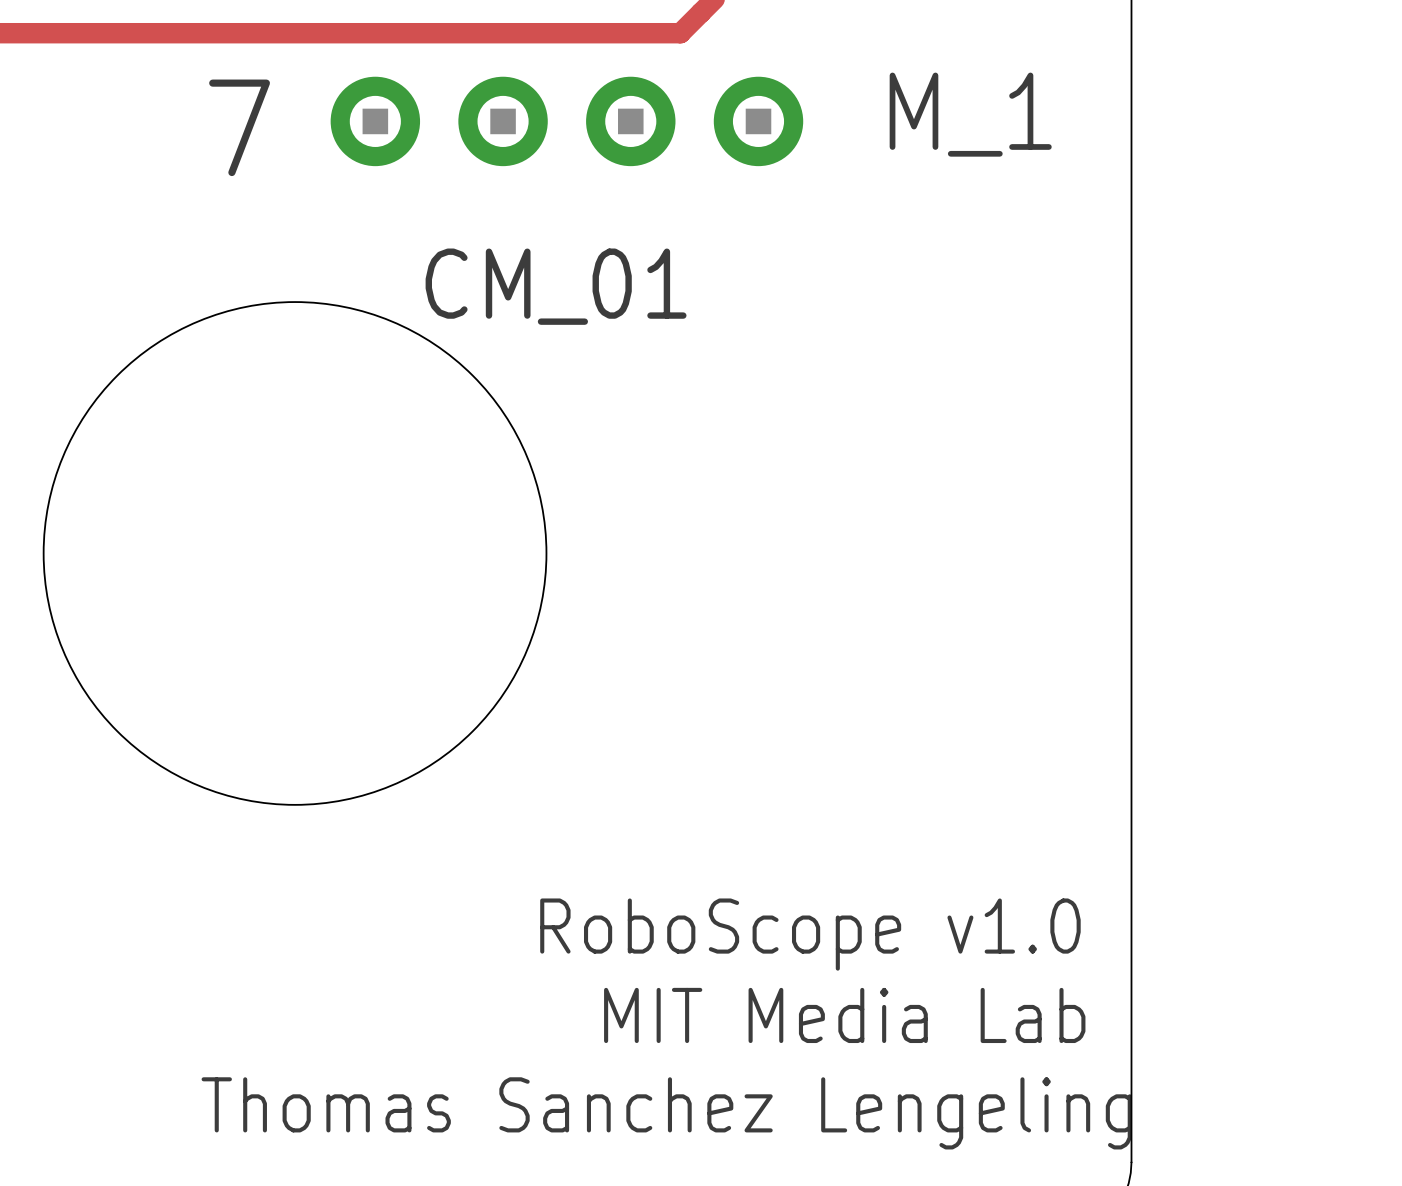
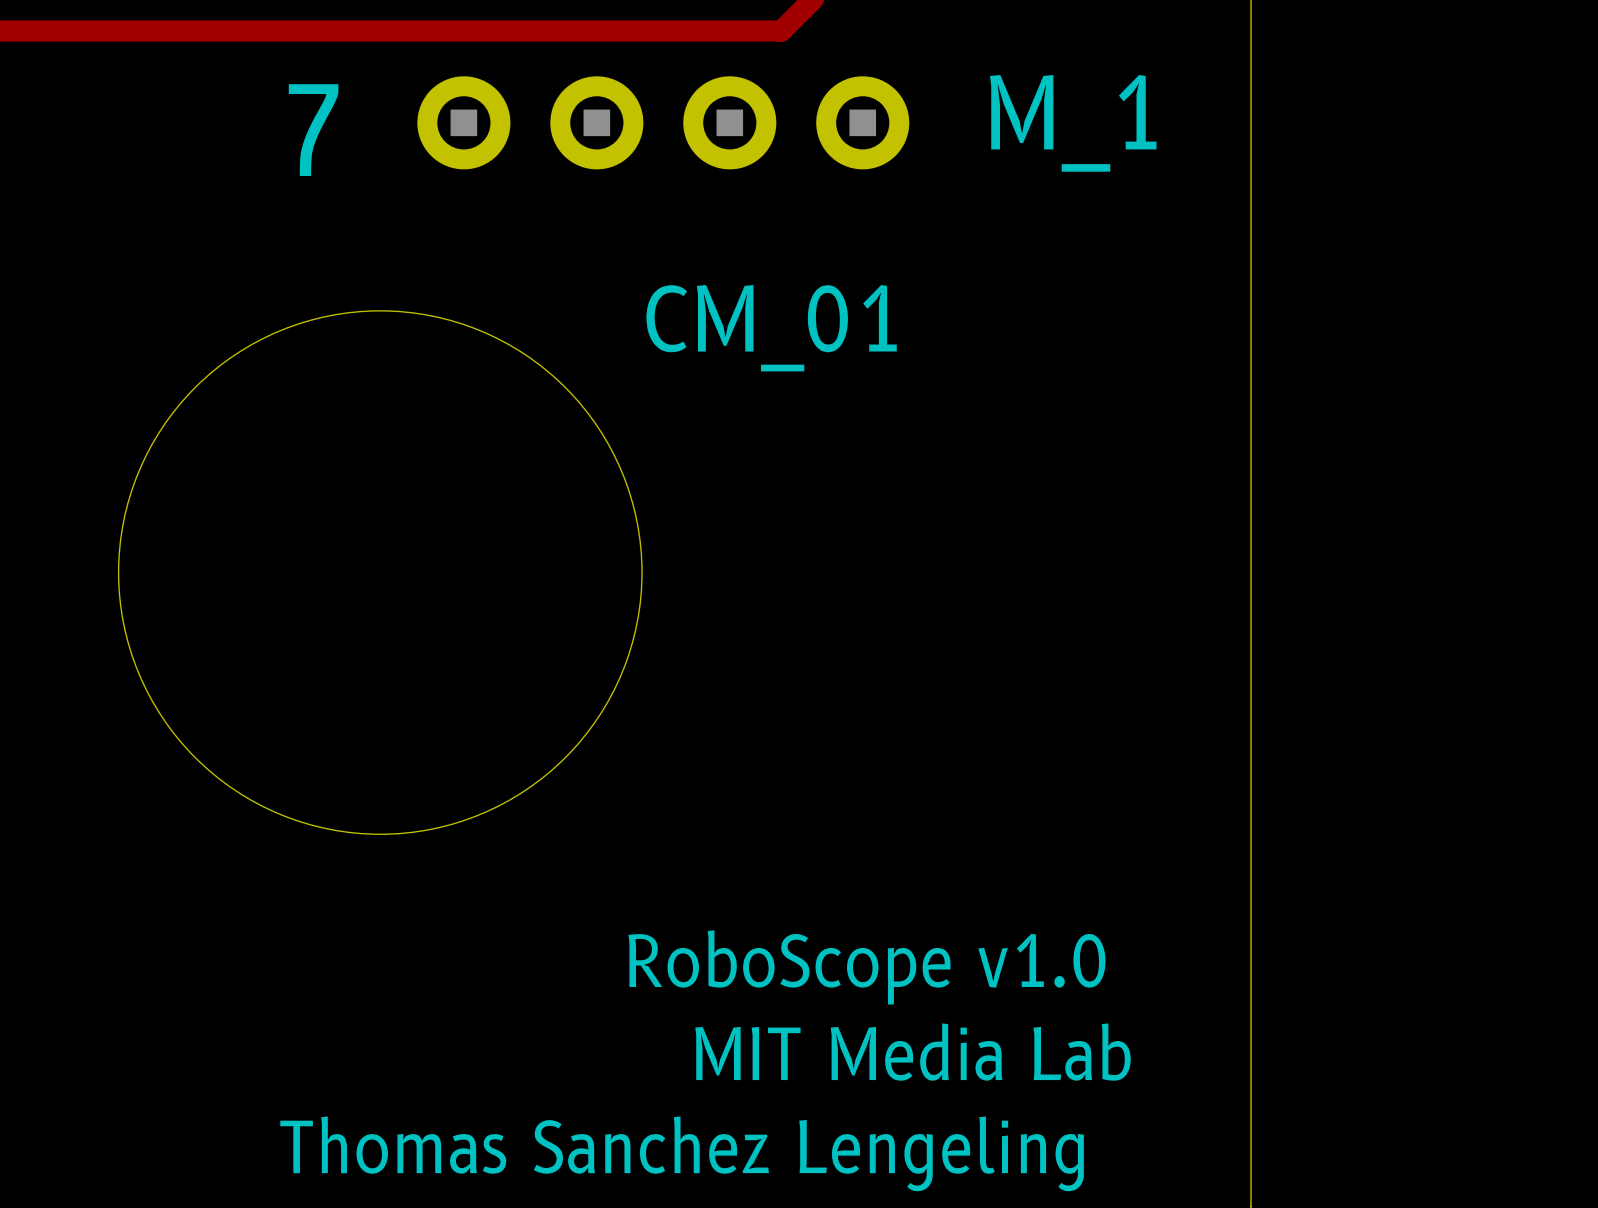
CM_01 name position: CM_01 (556, 286) -> CM_01 (771, 328)

